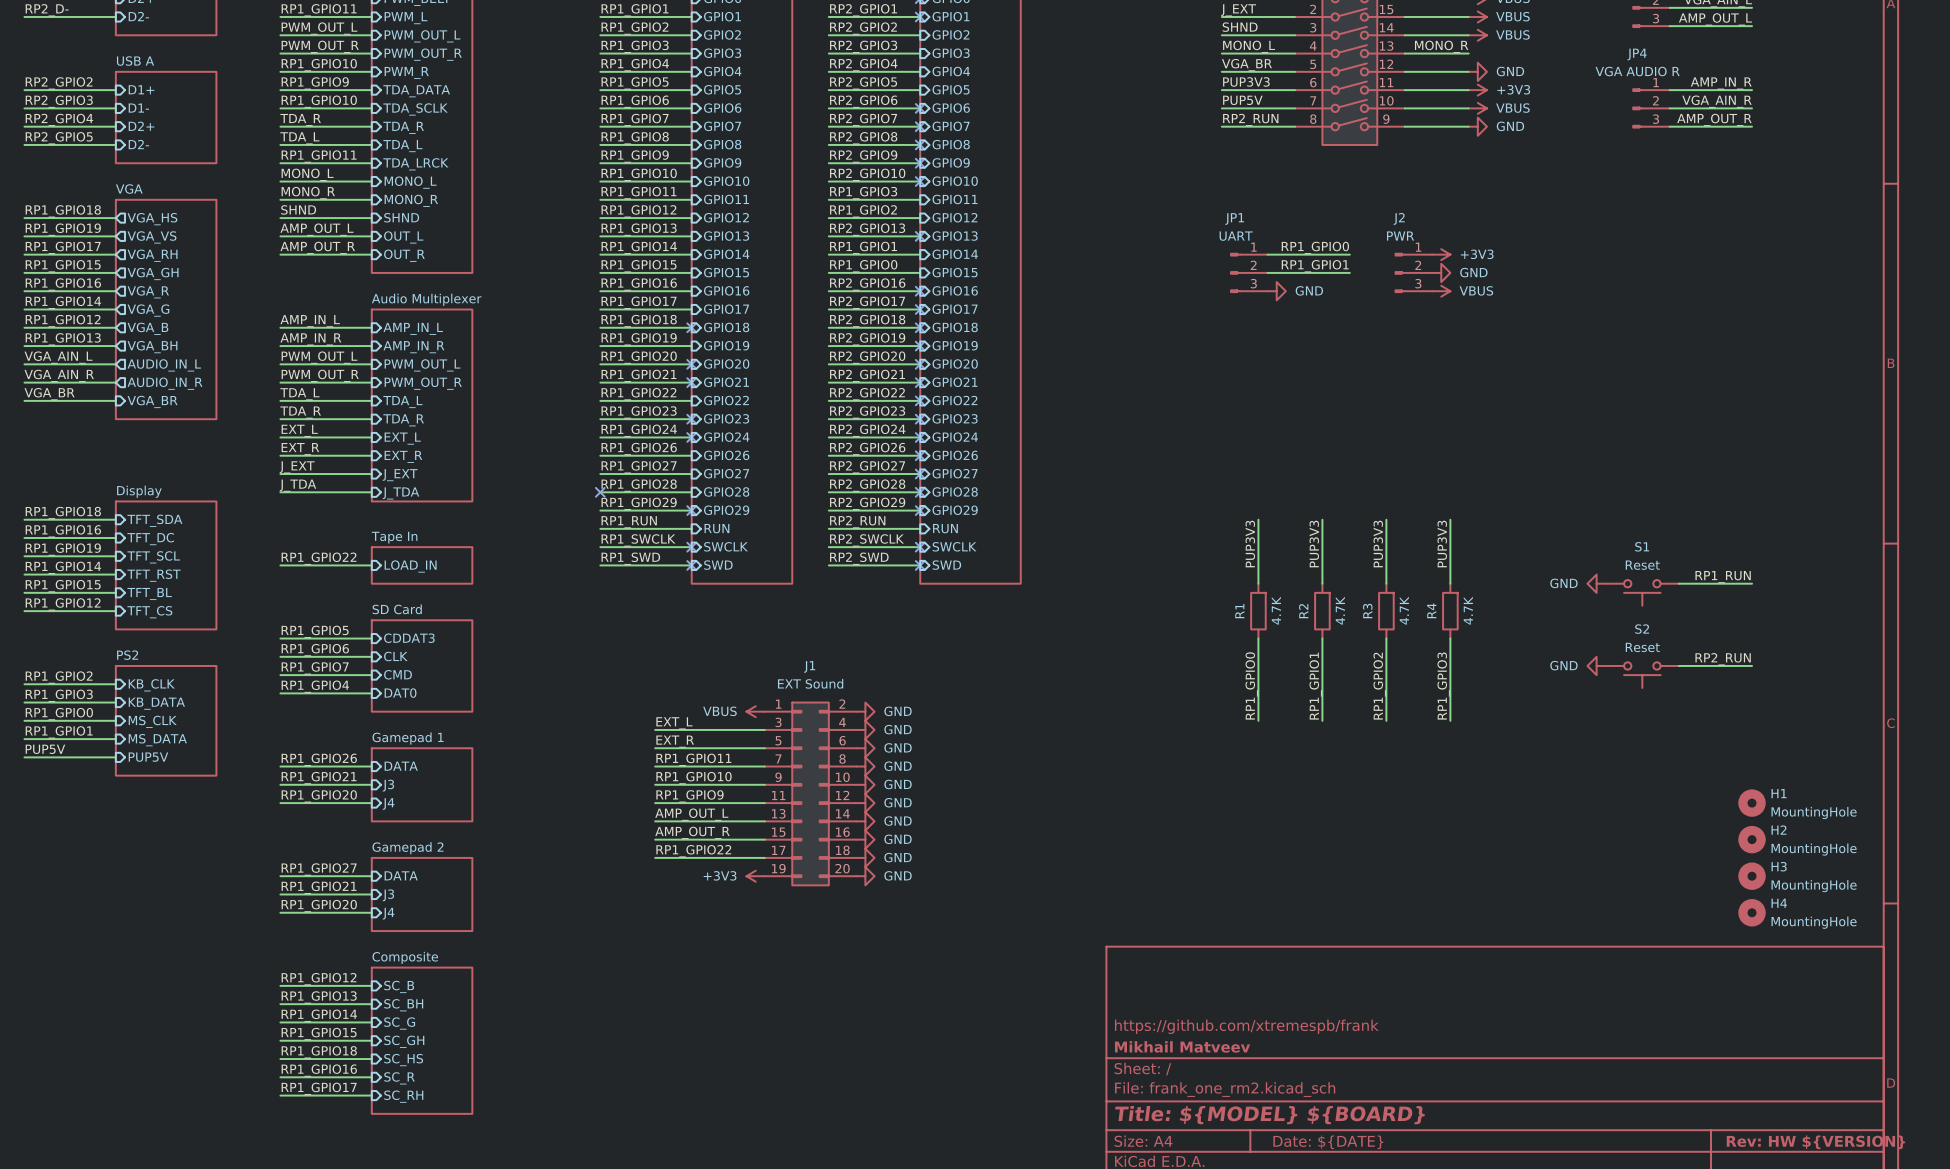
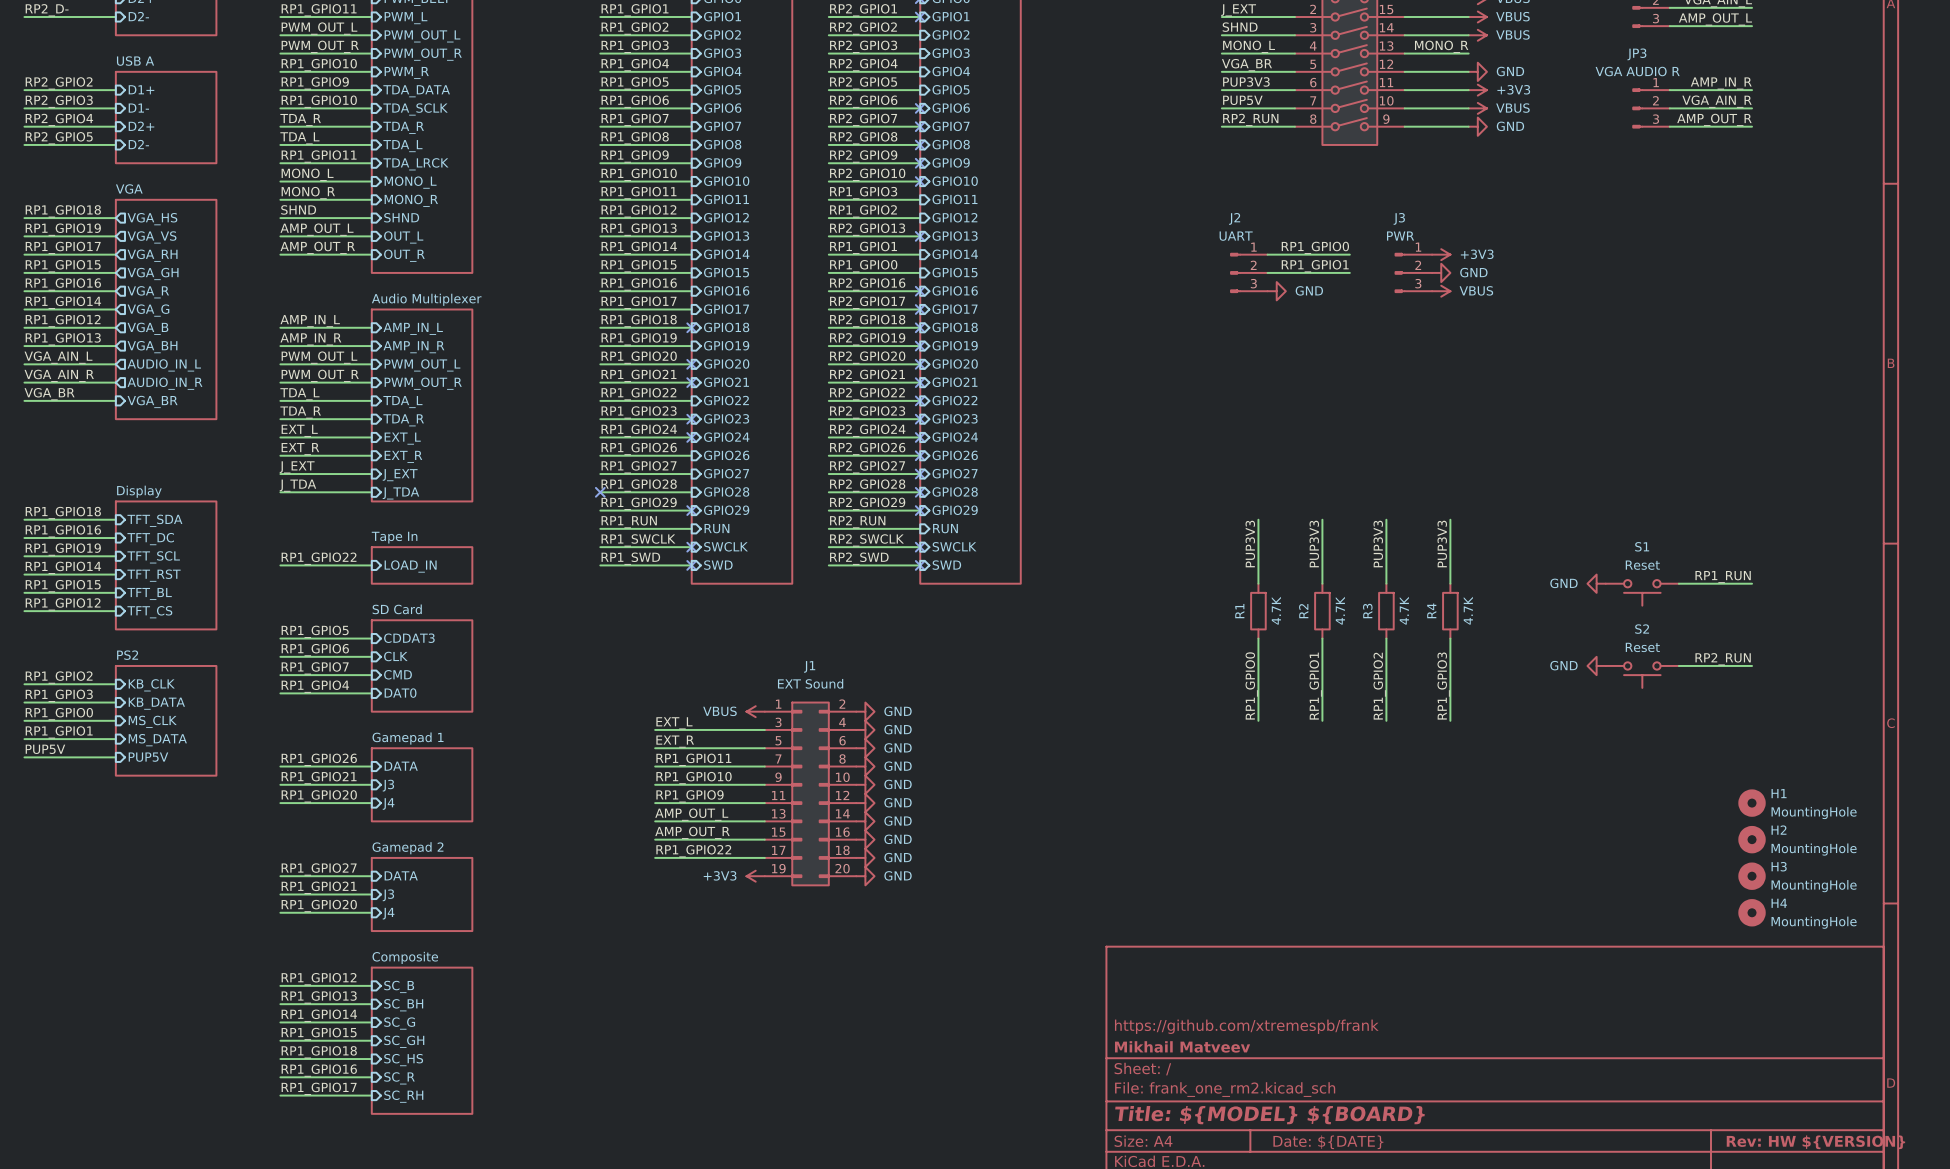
JP4 name: JP4 (1637, 54) -> JP3 (1636, 54)
J2 name: J2 (1399, 218) -> J3 (1399, 218)
JP1 name: JP1 (1234, 219) -> J2 (1234, 218)

